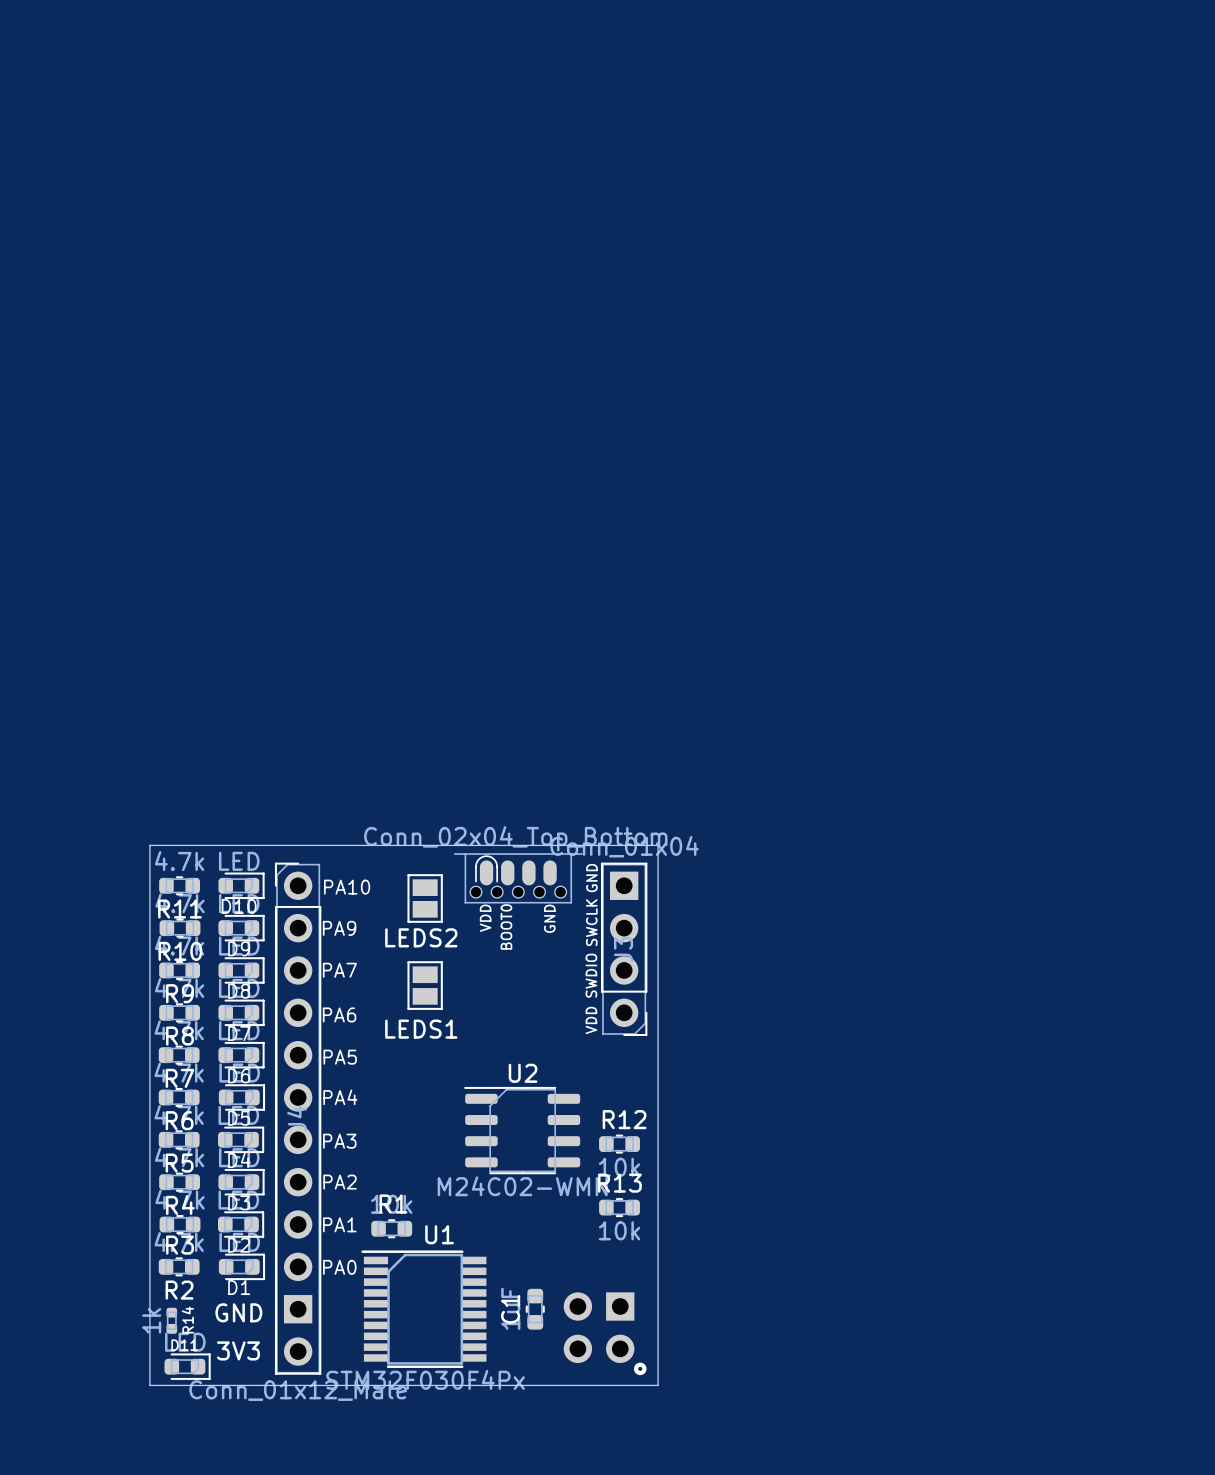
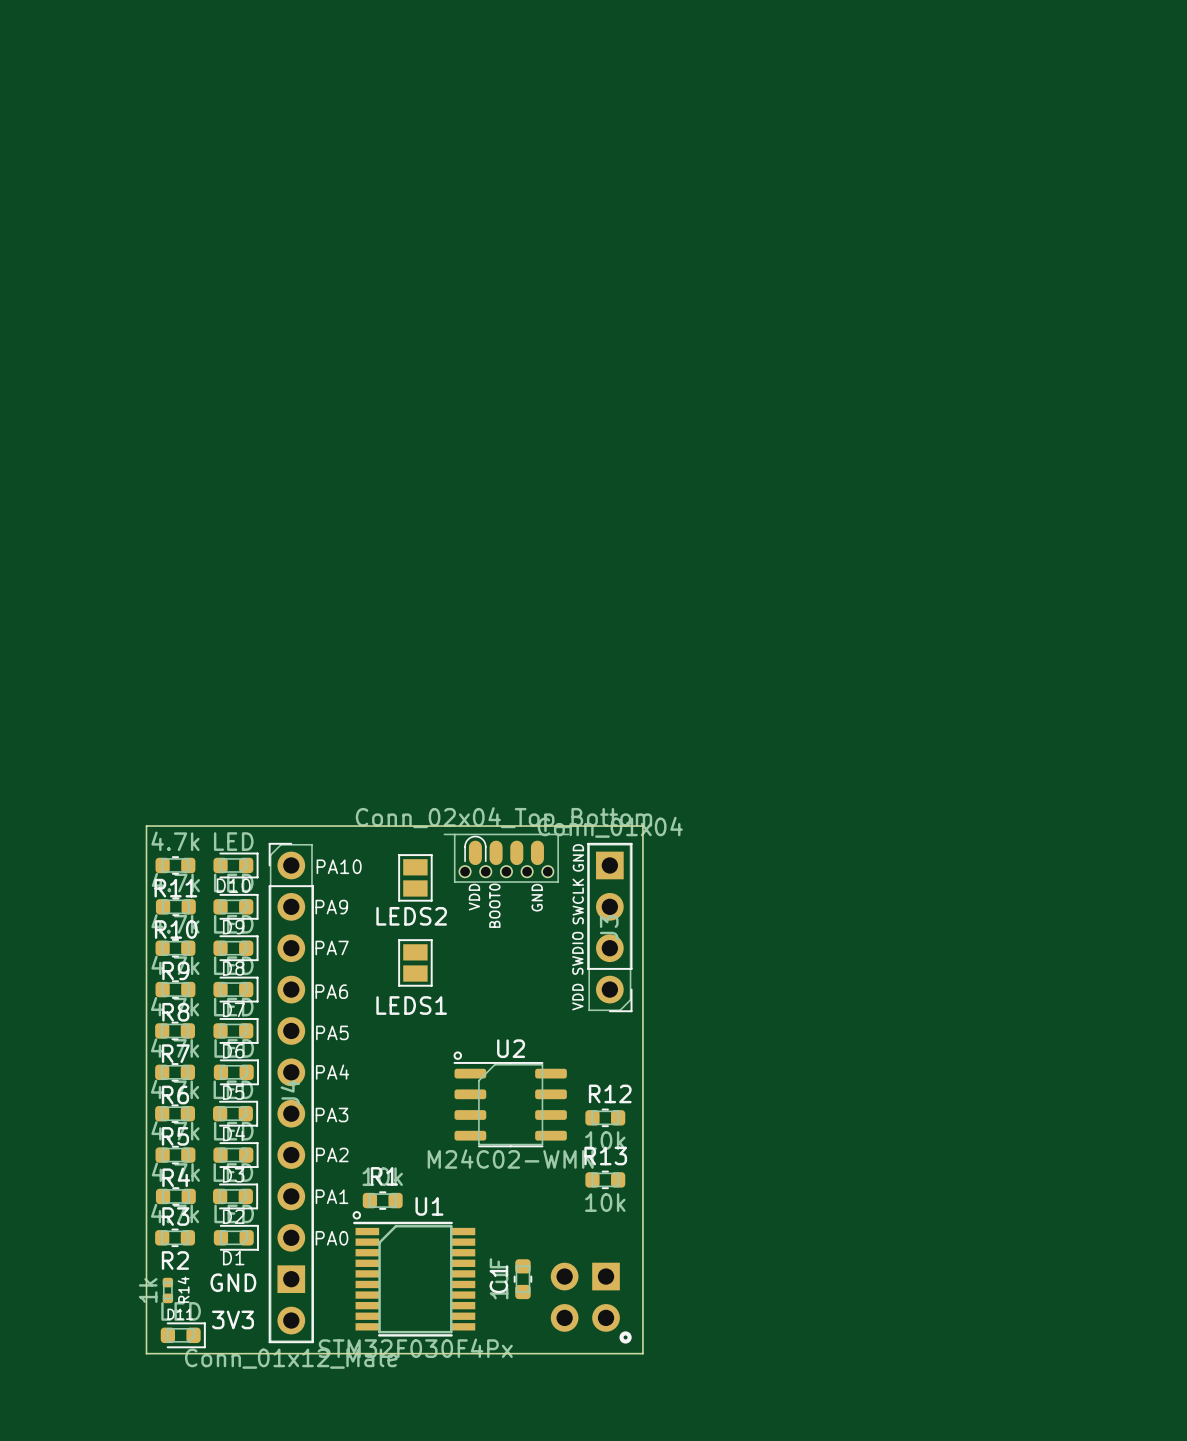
drawing: none -> [453, 1051, 463, 1060]
drawing: none -> [352, 1211, 362, 1220]

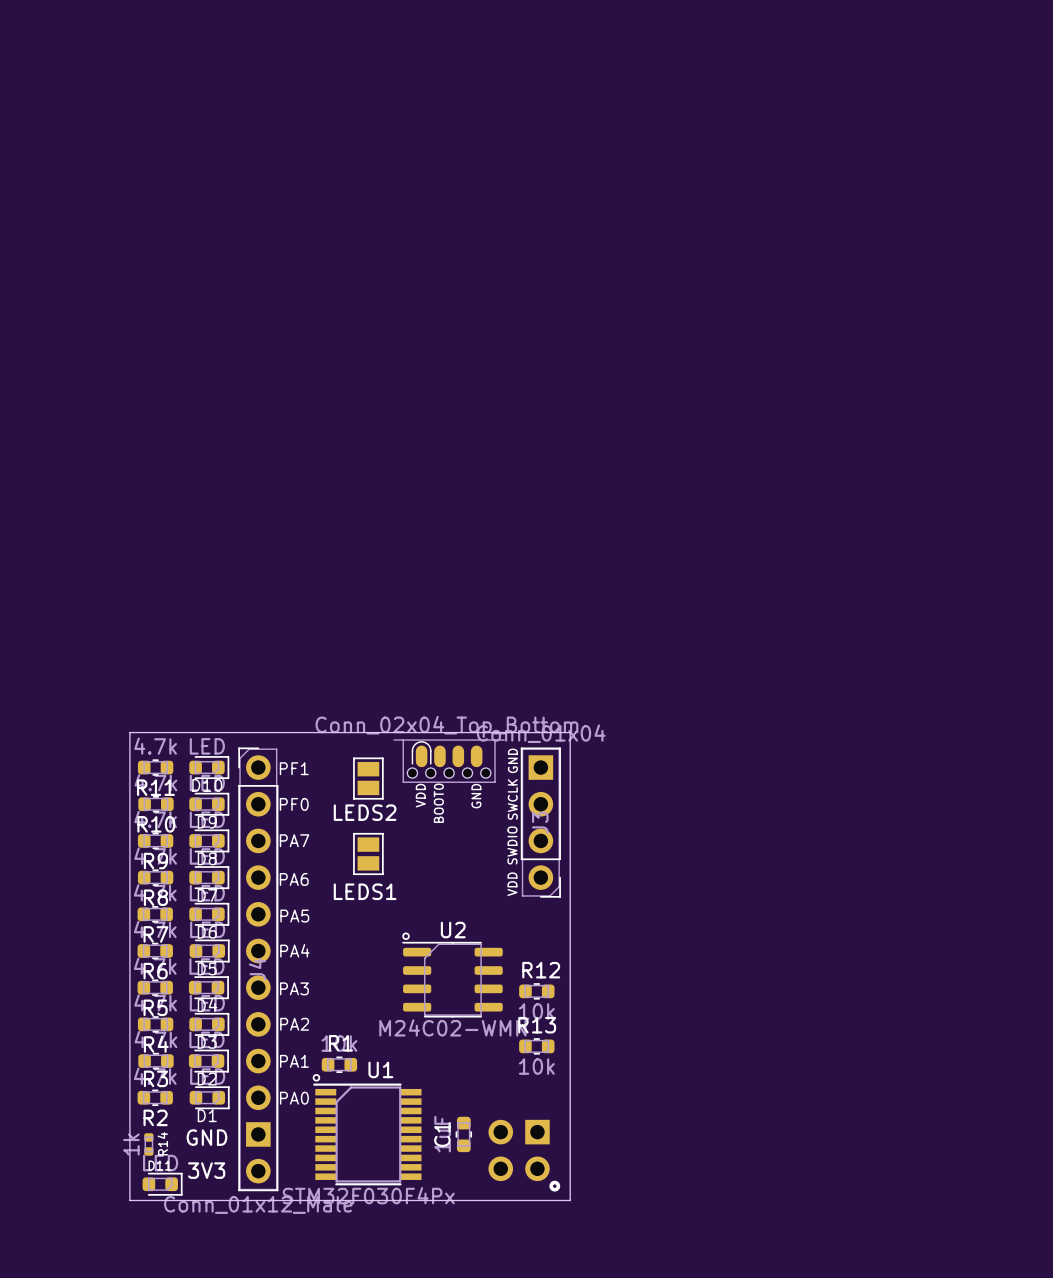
text: PA10 (339, 866) -> PF1 (294, 768)
text: PA9 (331, 907) -> PF0 (294, 804)

